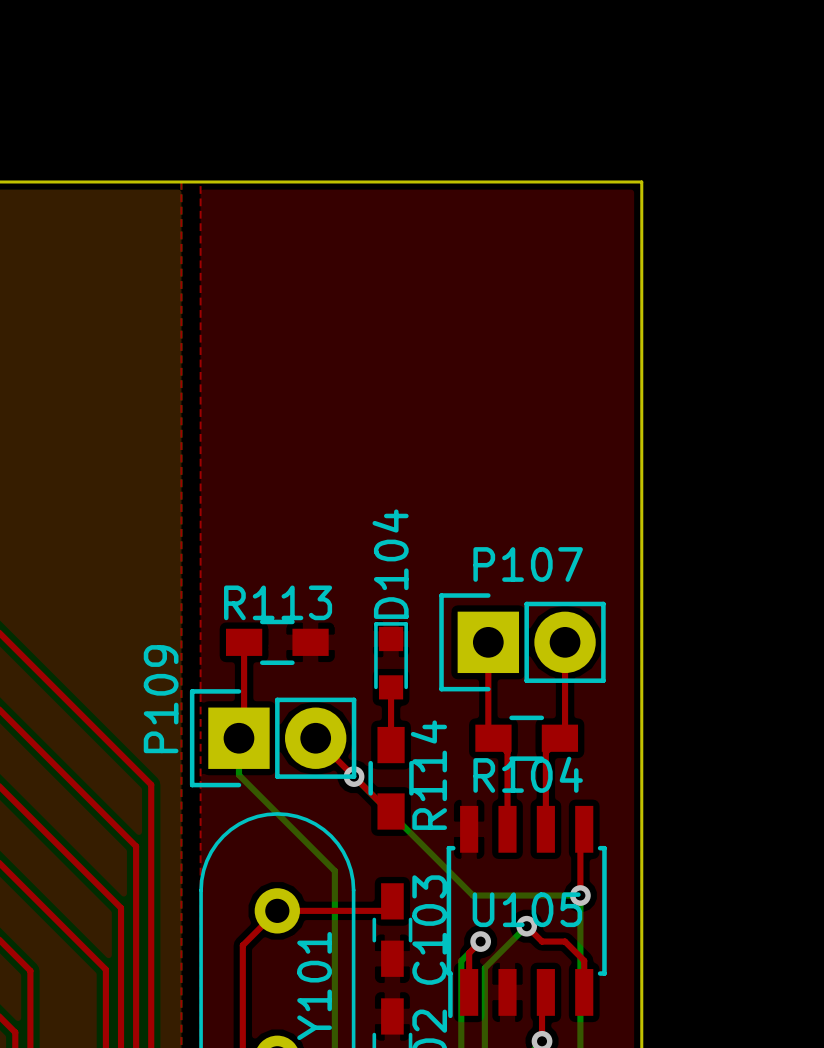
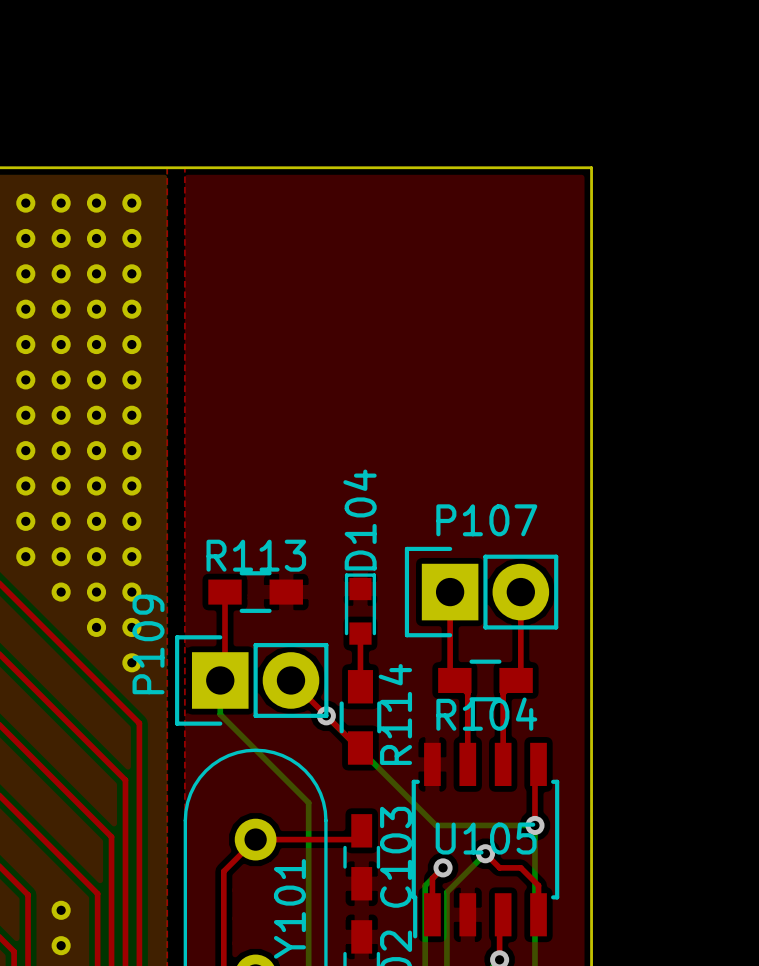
part: none -> (25, 203)
part: none -> (61, 203)
part: none -> (96, 203)
part: none -> (131, 203)
part: none -> (25, 238)
part: none -> (61, 238)
part: none -> (96, 238)
part: none -> (131, 238)
part: none -> (25, 273)
part: none -> (61, 273)
part: none -> (96, 273)
part: none -> (131, 273)
part: none -> (25, 309)
part: none -> (61, 309)
part: none -> (96, 309)
part: none -> (131, 309)
part: none -> (25, 344)
part: none -> (61, 344)
part: none -> (96, 344)
part: none -> (131, 344)
part: none -> (25, 379)
part: none -> (61, 379)
part: none -> (96, 379)
part: none -> (131, 379)
part: none -> (25, 415)
part: none -> (61, 415)
part: none -> (96, 415)
part: none -> (131, 415)
part: none -> (25, 450)
part: none -> (61, 450)
part: none -> (96, 450)
part: none -> (131, 450)
part: none -> (25, 485)
part: none -> (61, 485)
part: none -> (96, 485)
part: none -> (131, 485)
part: none -> (25, 521)
part: none -> (61, 521)
part: none -> (96, 521)
part: none -> (131, 521)
part: none -> (25, 556)
part: none -> (61, 556)
part: none -> (96, 556)
part: none -> (131, 556)
part: none -> (61, 592)
part: none -> (96, 592)
part: none -> (131, 592)
part: none -> (96, 627)
part: none -> (131, 627)
part: none -> (131, 662)
part: none -> (61, 910)
part: none -> (61, 945)

